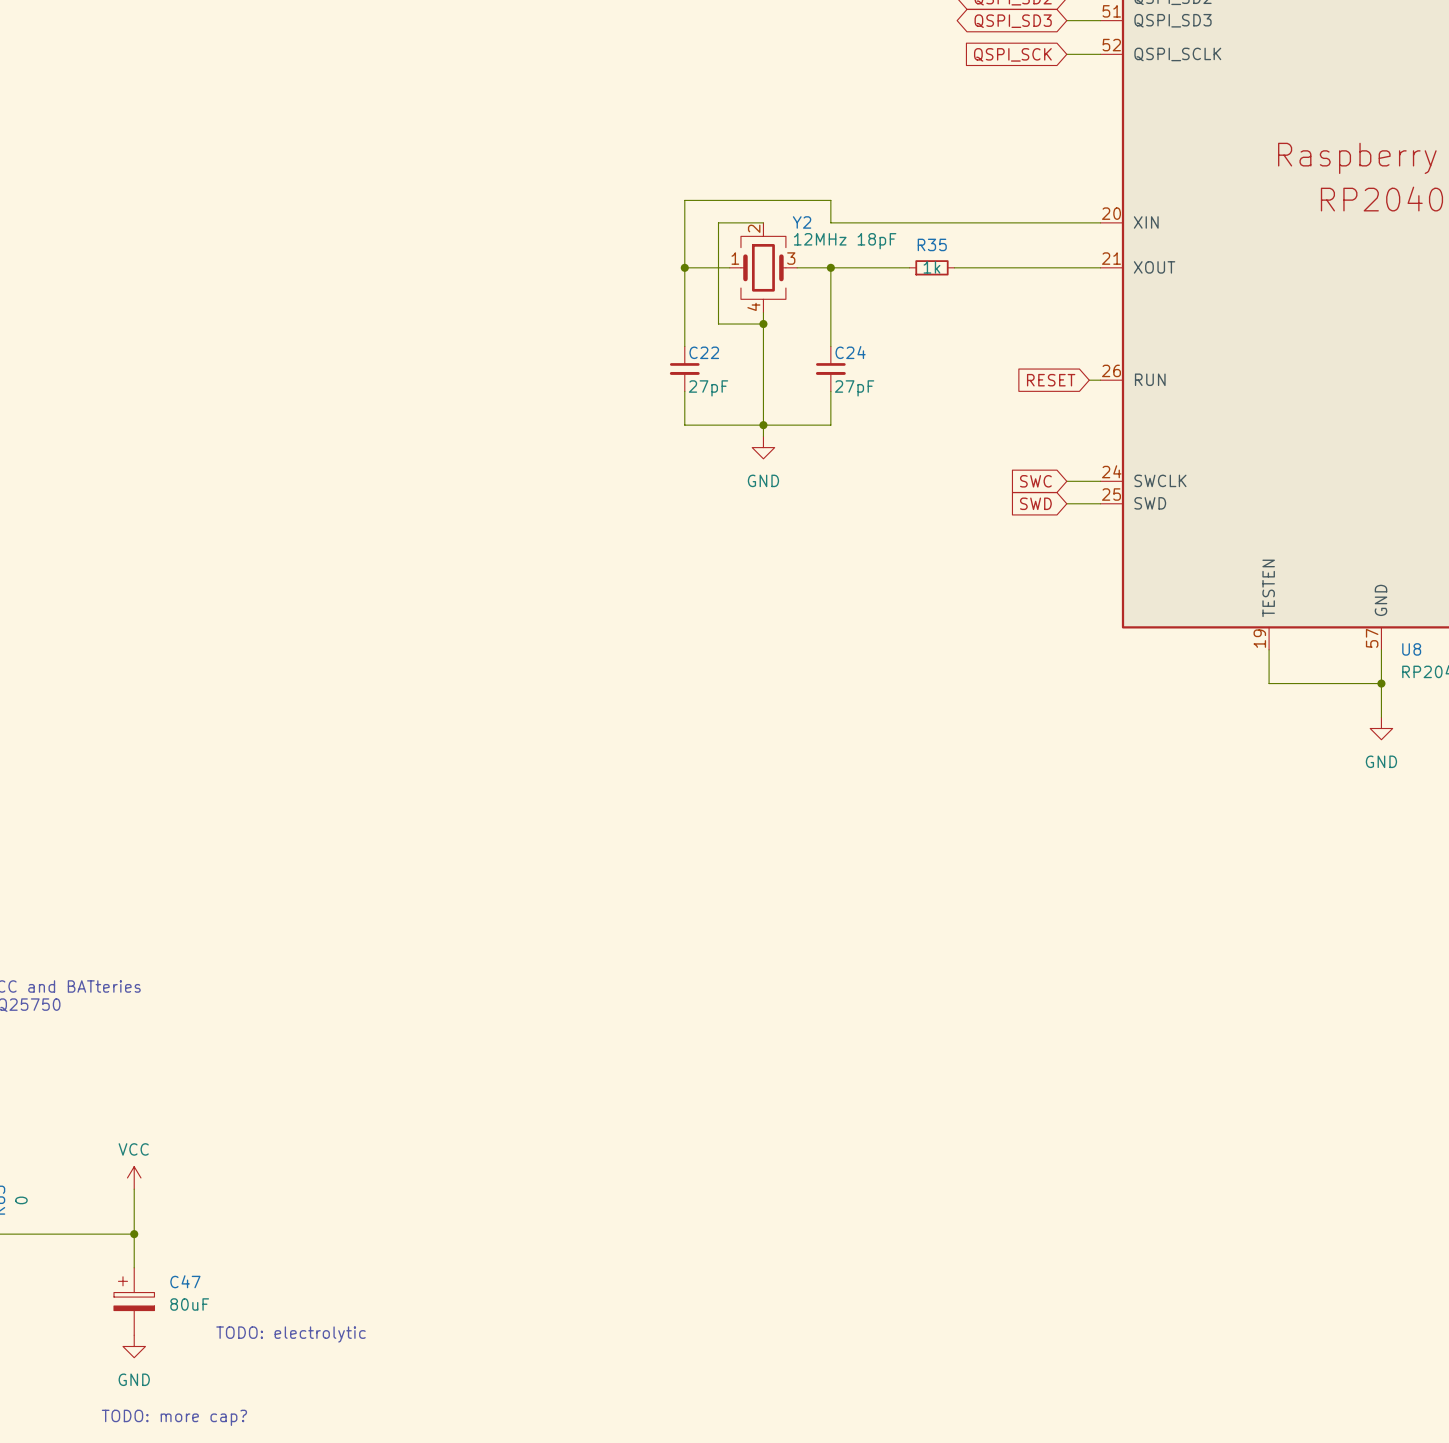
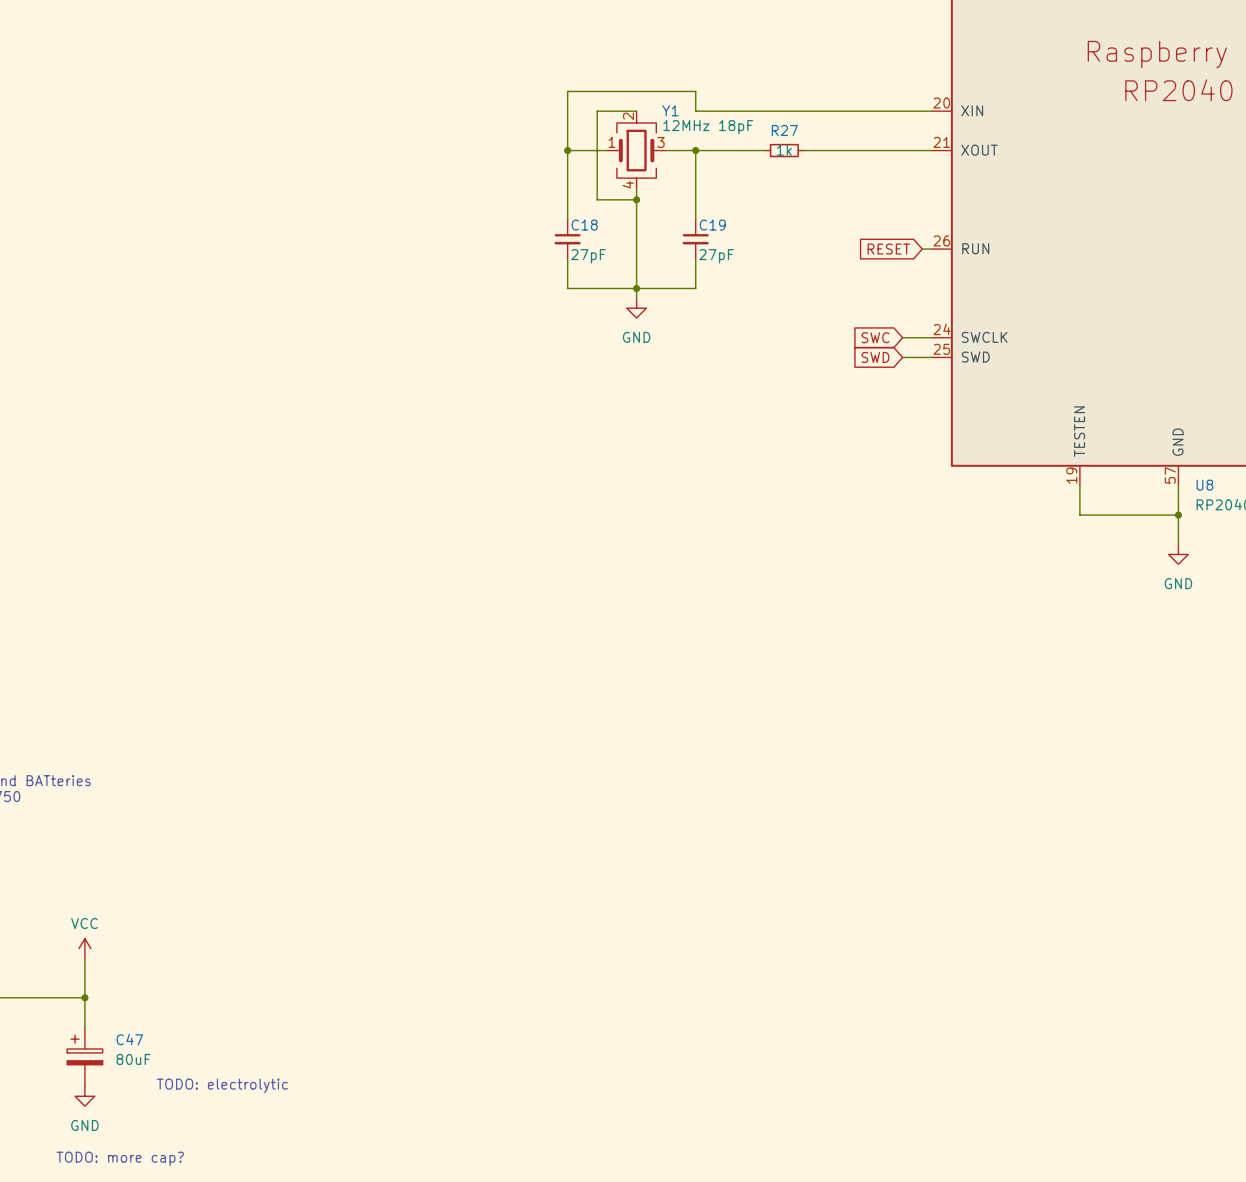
Y2 name: Y2 (802, 222) -> Y1 (670, 110)
R35 name: R35 (932, 244) -> R27 (784, 130)
C22 name: C22 (704, 352) -> C18 (584, 225)
C24 name: C24 (850, 352) -> C19 (712, 225)

